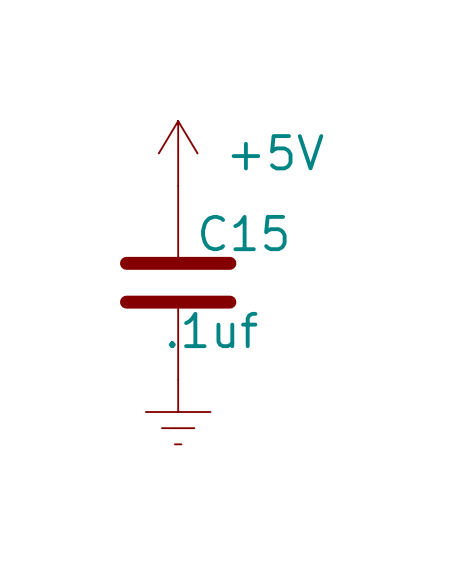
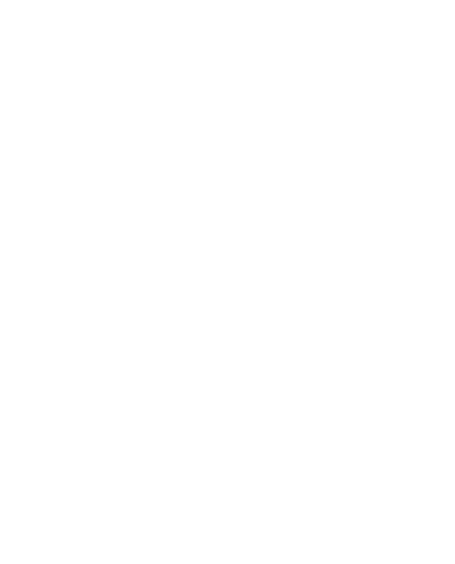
power symbol: +5V (178, 153) -> none
C15: .1uf (178, 282) -> none
power symbol: (178, 412) -> none

